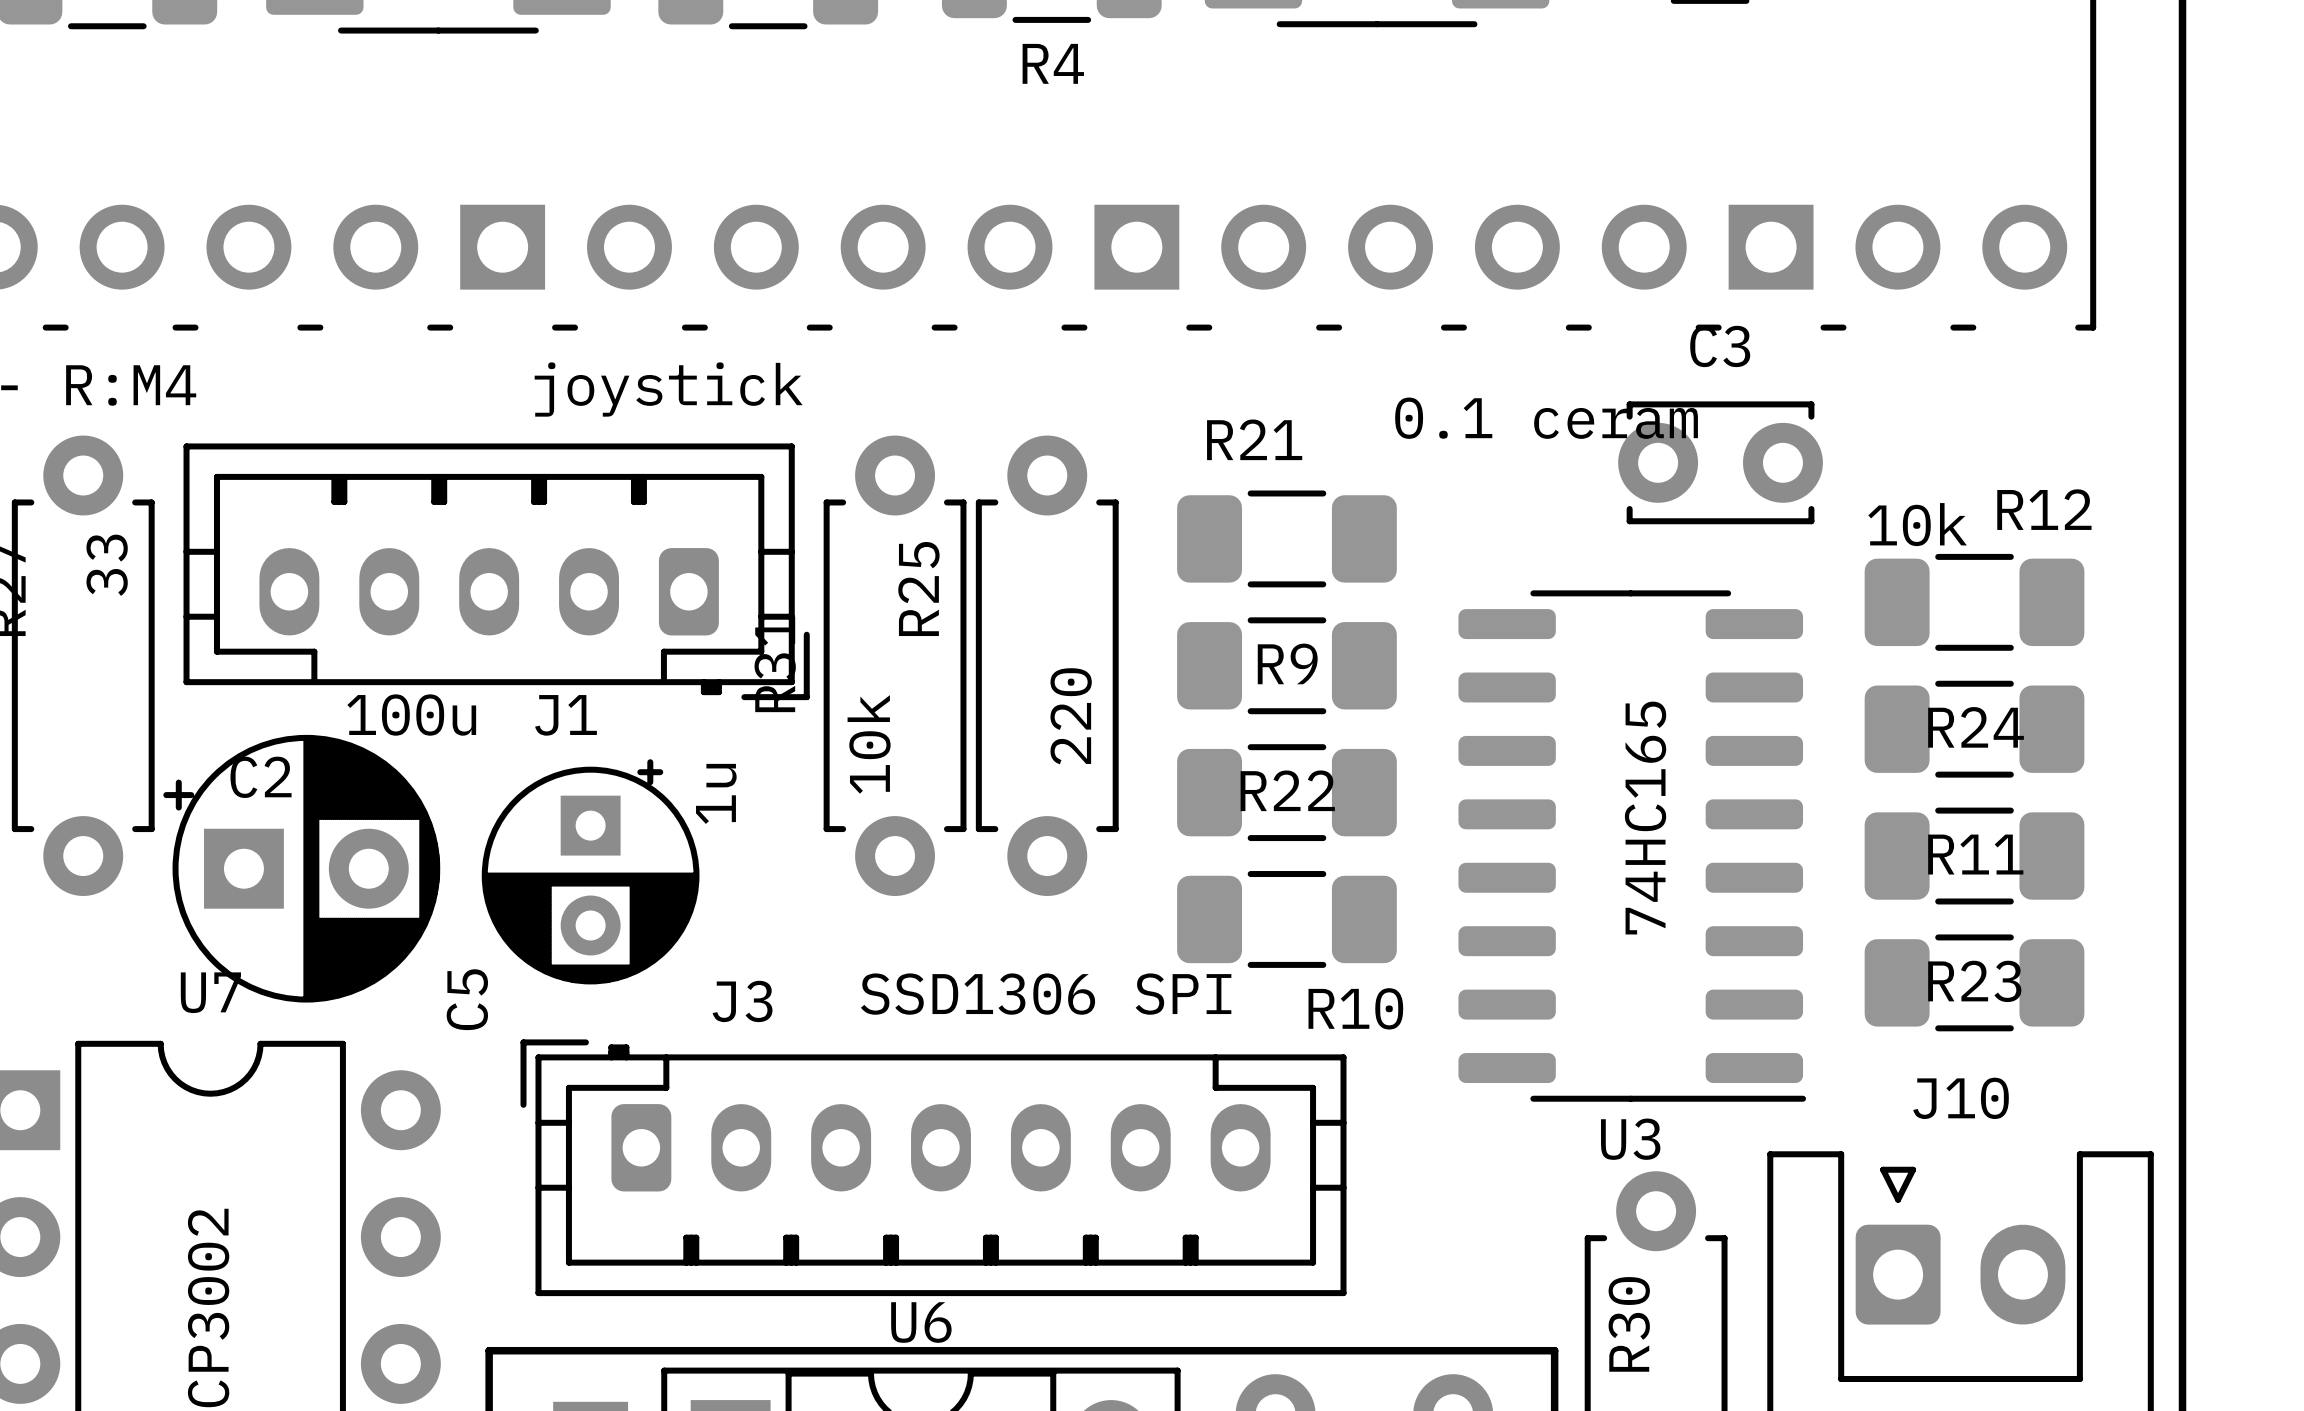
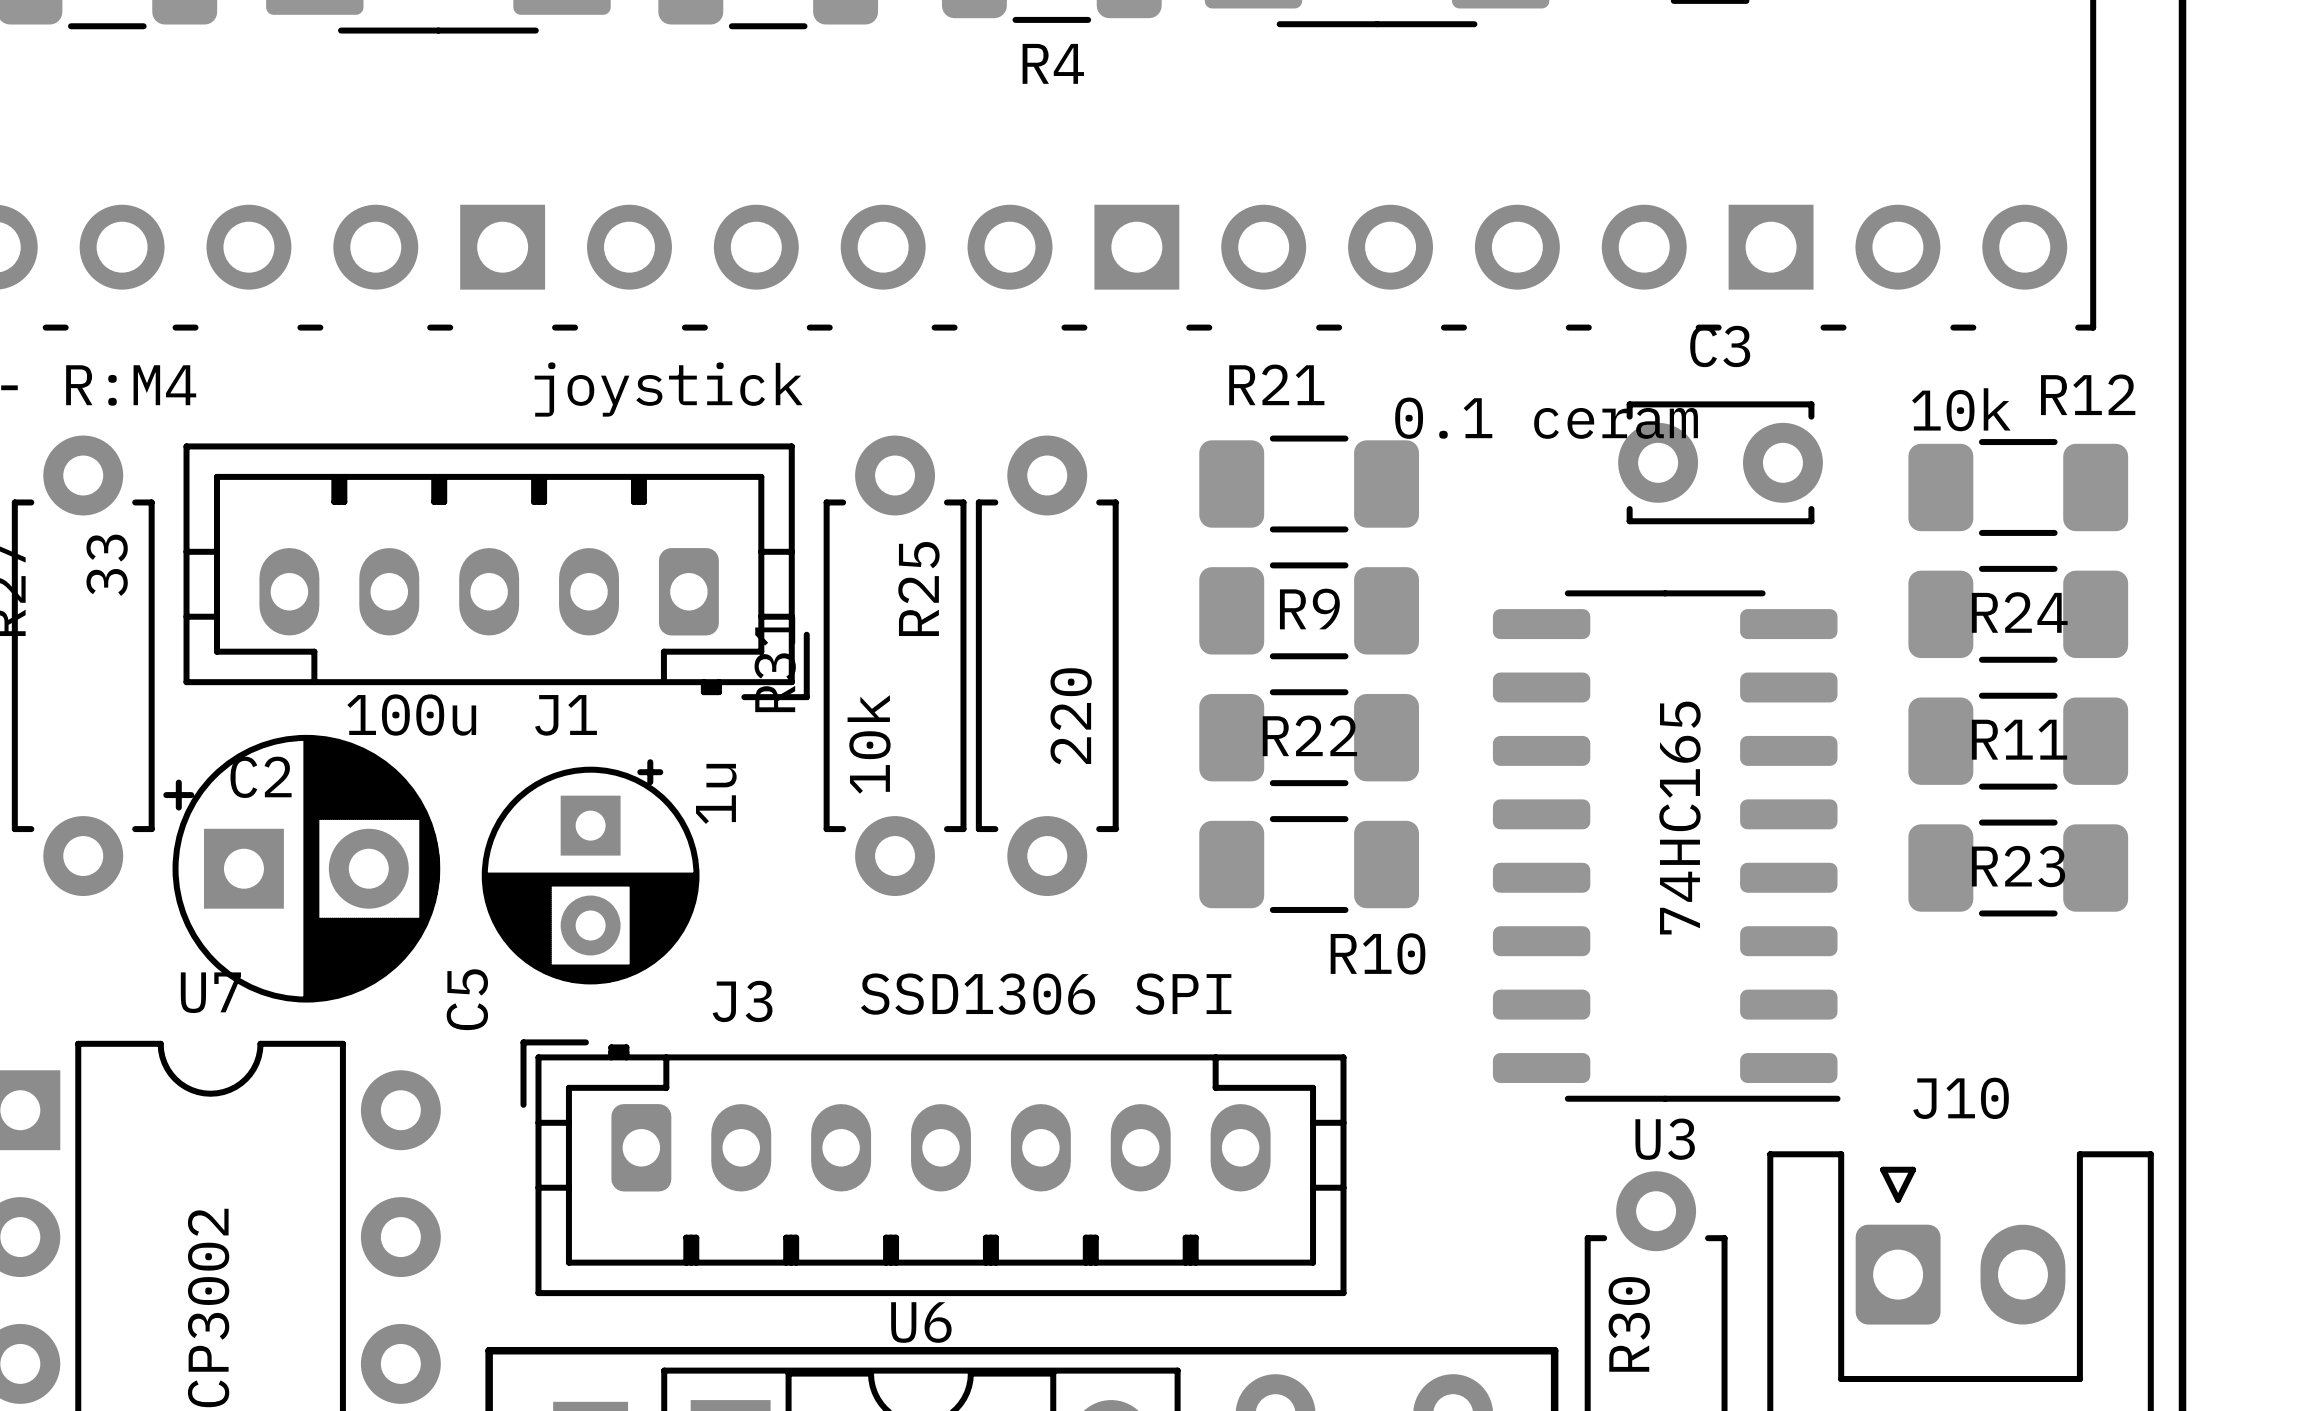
R21 position: (1286, 538) -> (1309, 483)
R12 position: (1974, 602) -> (2018, 487)
R9 position: (1286, 665) -> (1309, 610)
R24 position: (1974, 729) -> (2018, 614)
R22 position: (1286, 792) -> (1309, 737)
U3 position: (1632, 846) -> (1666, 846)
R11 position: (1974, 856) -> (2018, 741)
R10 position: (1286, 919) -> (1309, 864)
R23 position: (1974, 982) -> (2018, 868)

